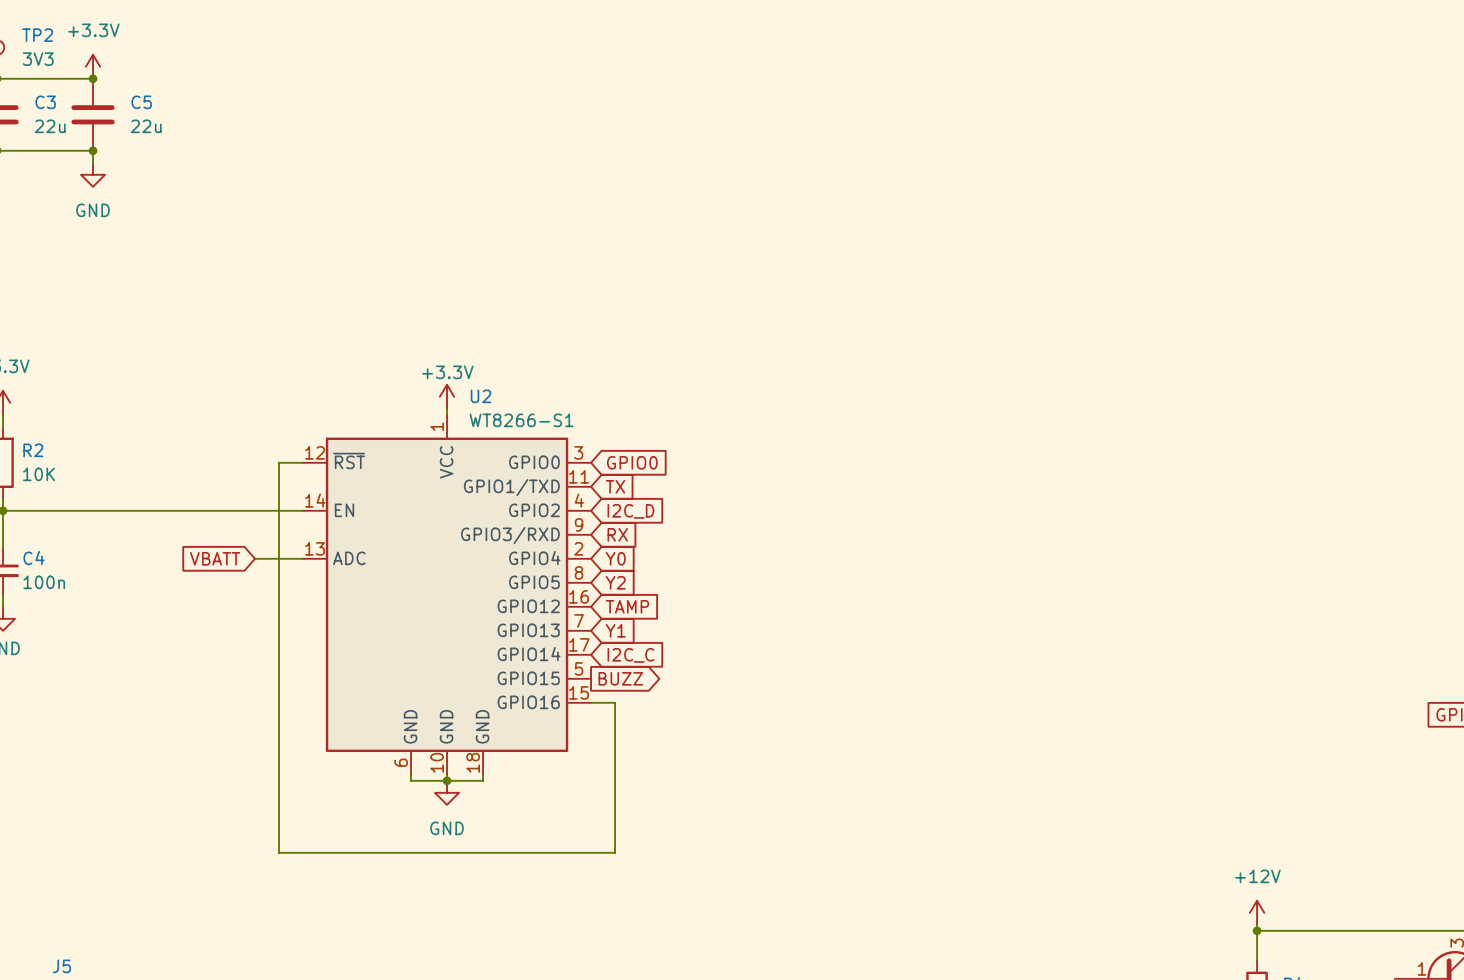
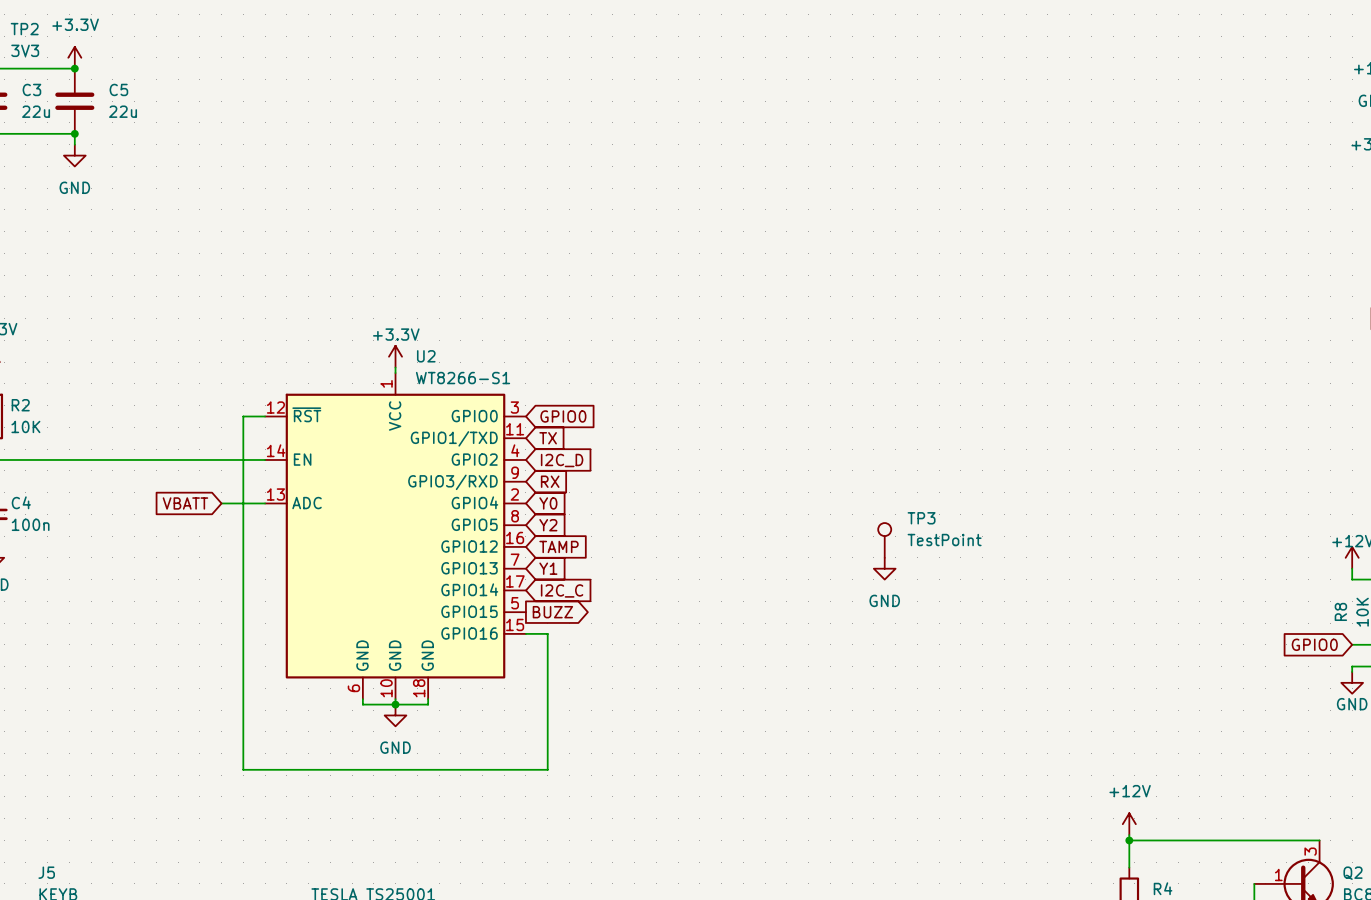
TP3: none -> TestPoint (884, 540)
power symbol: none -> GND (884, 568)

